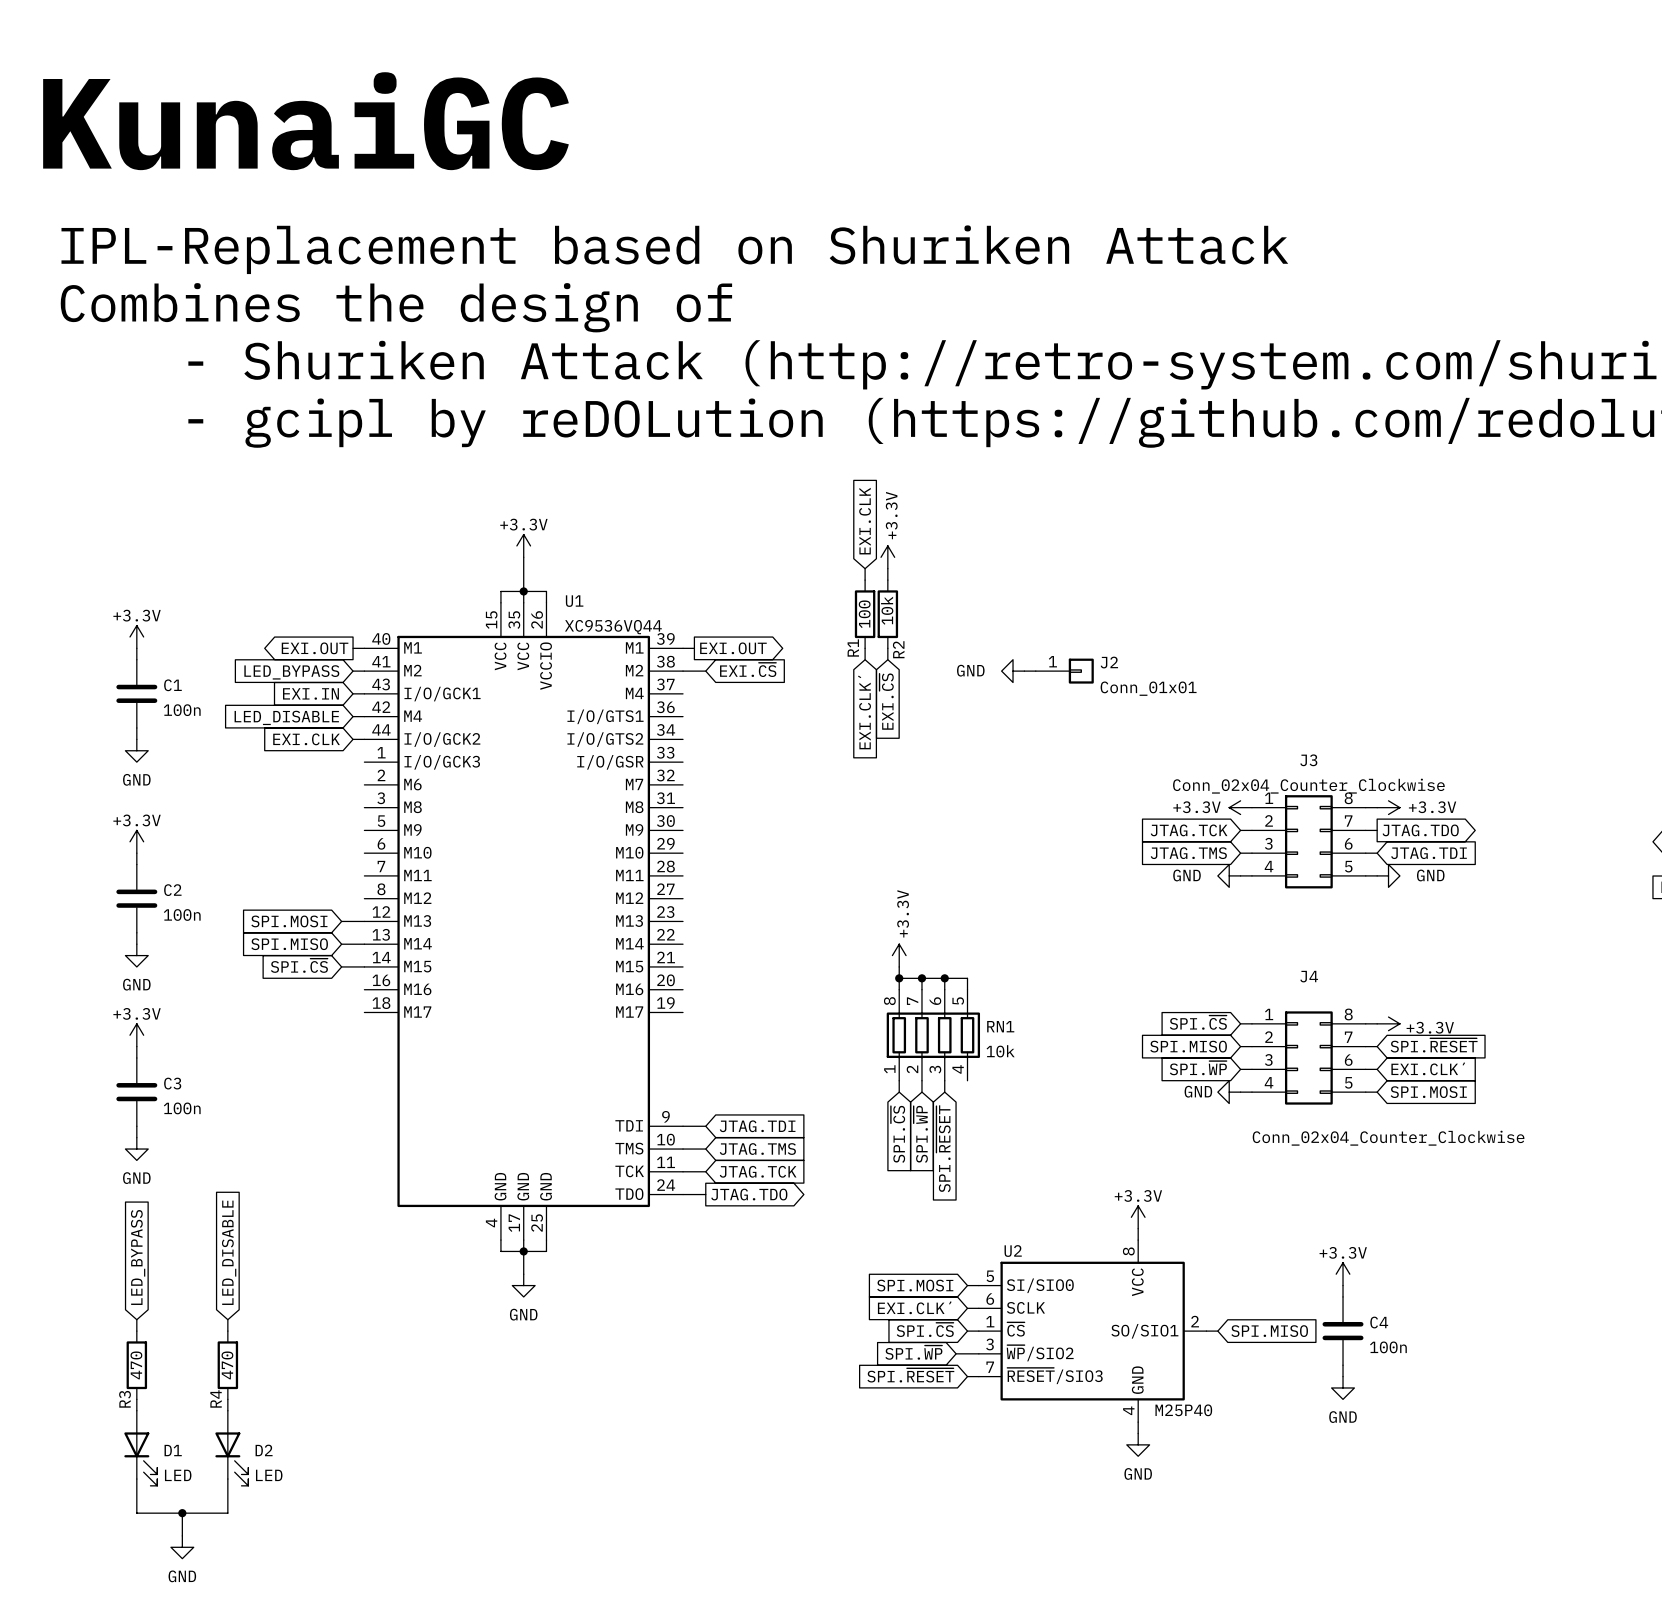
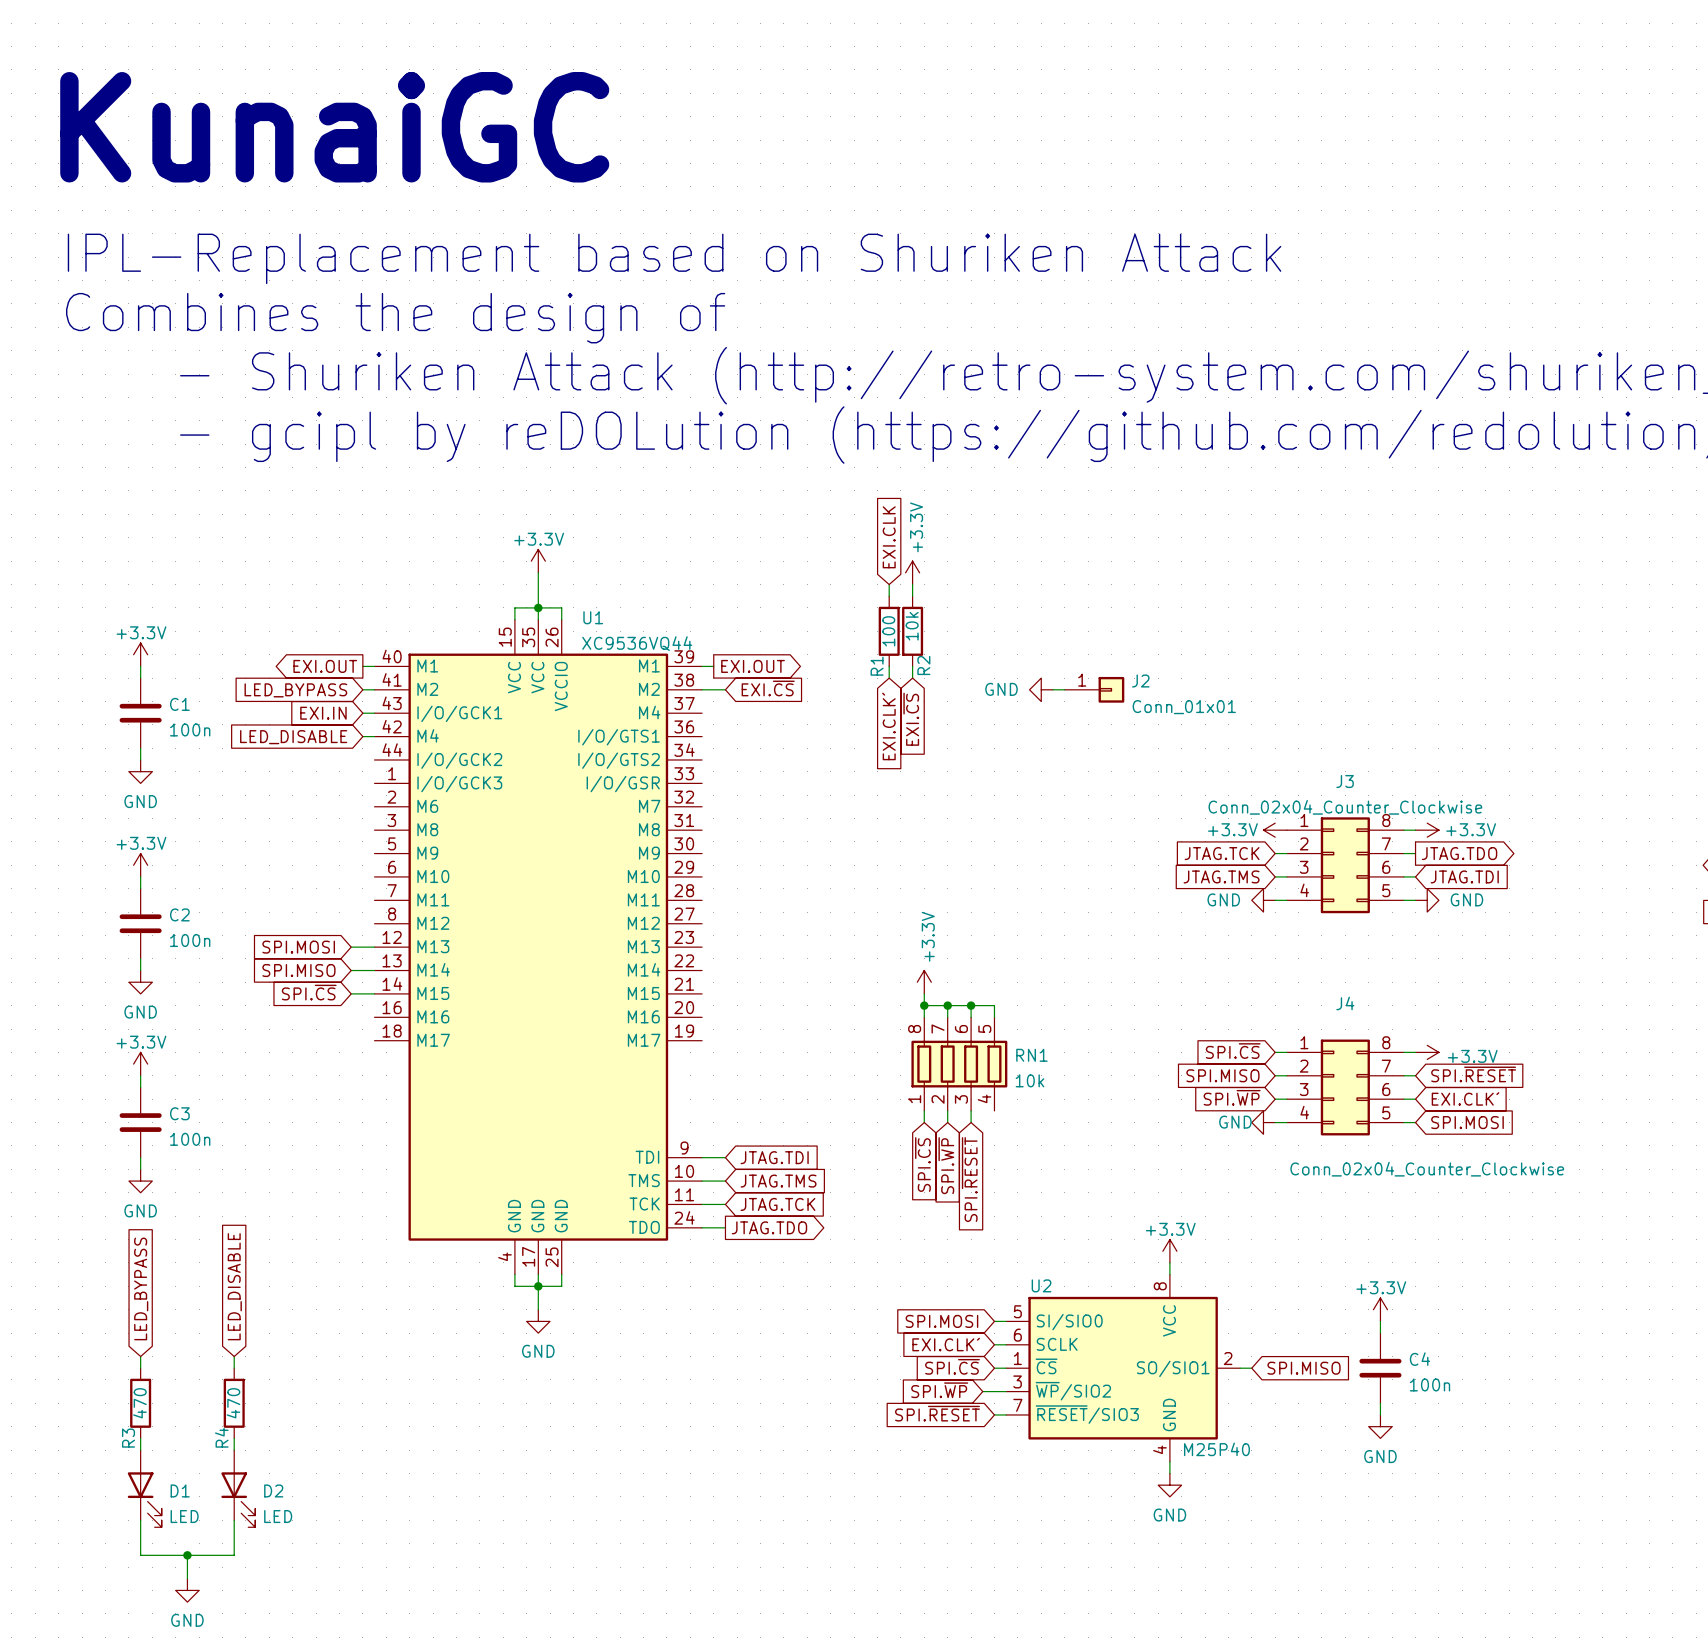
global label: EXI.CLK (306, 739) -> none
wire: (353, 739) (364, 739) -> none

